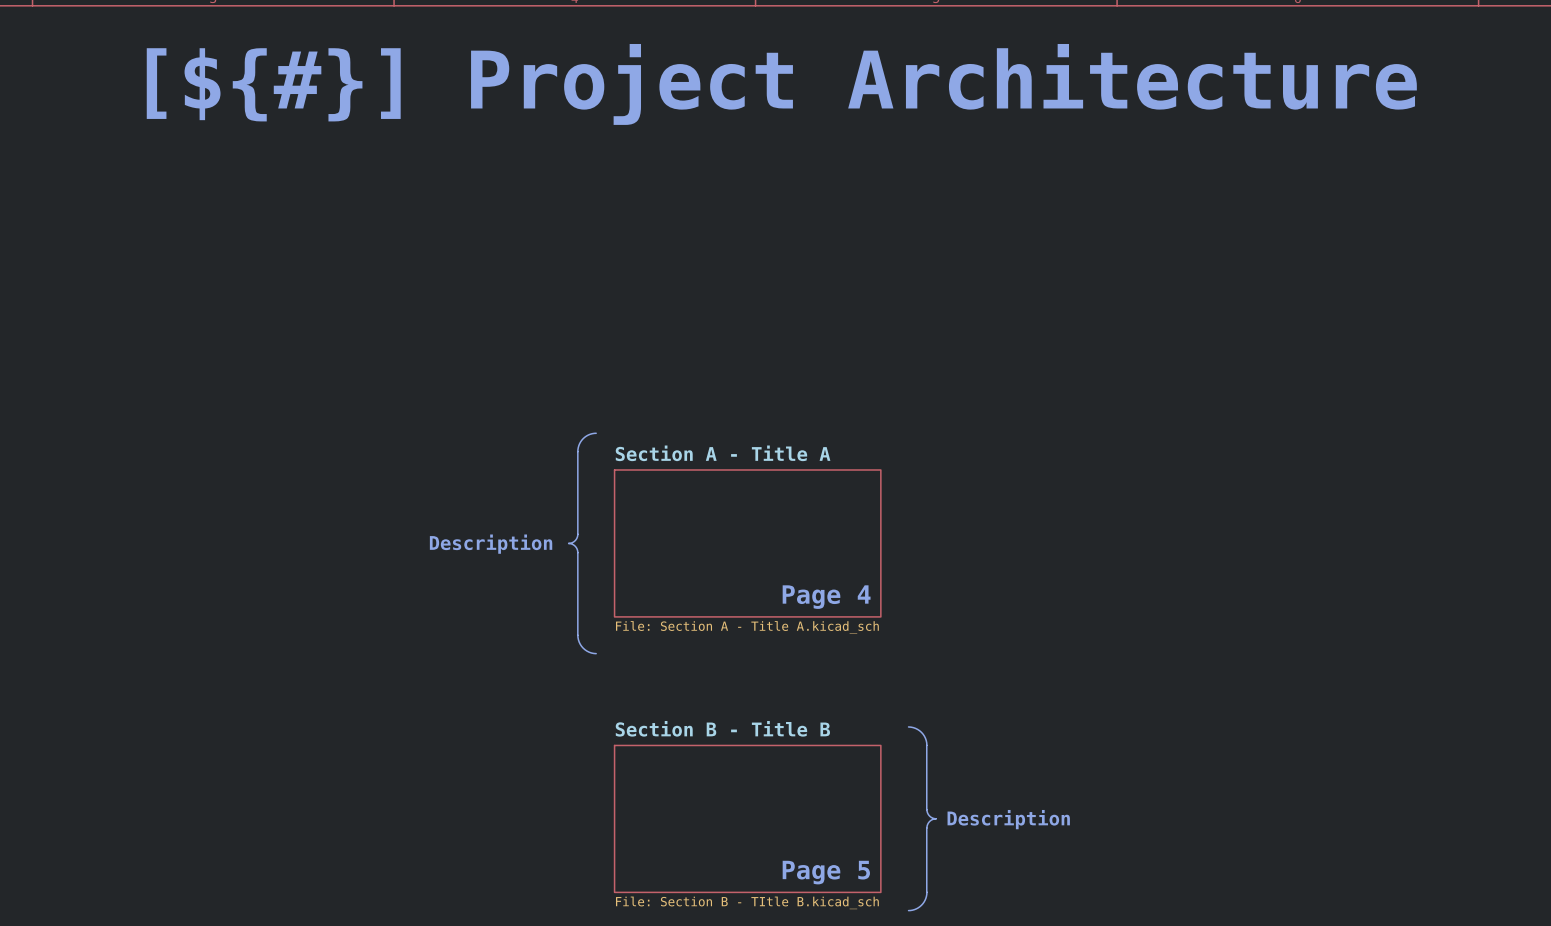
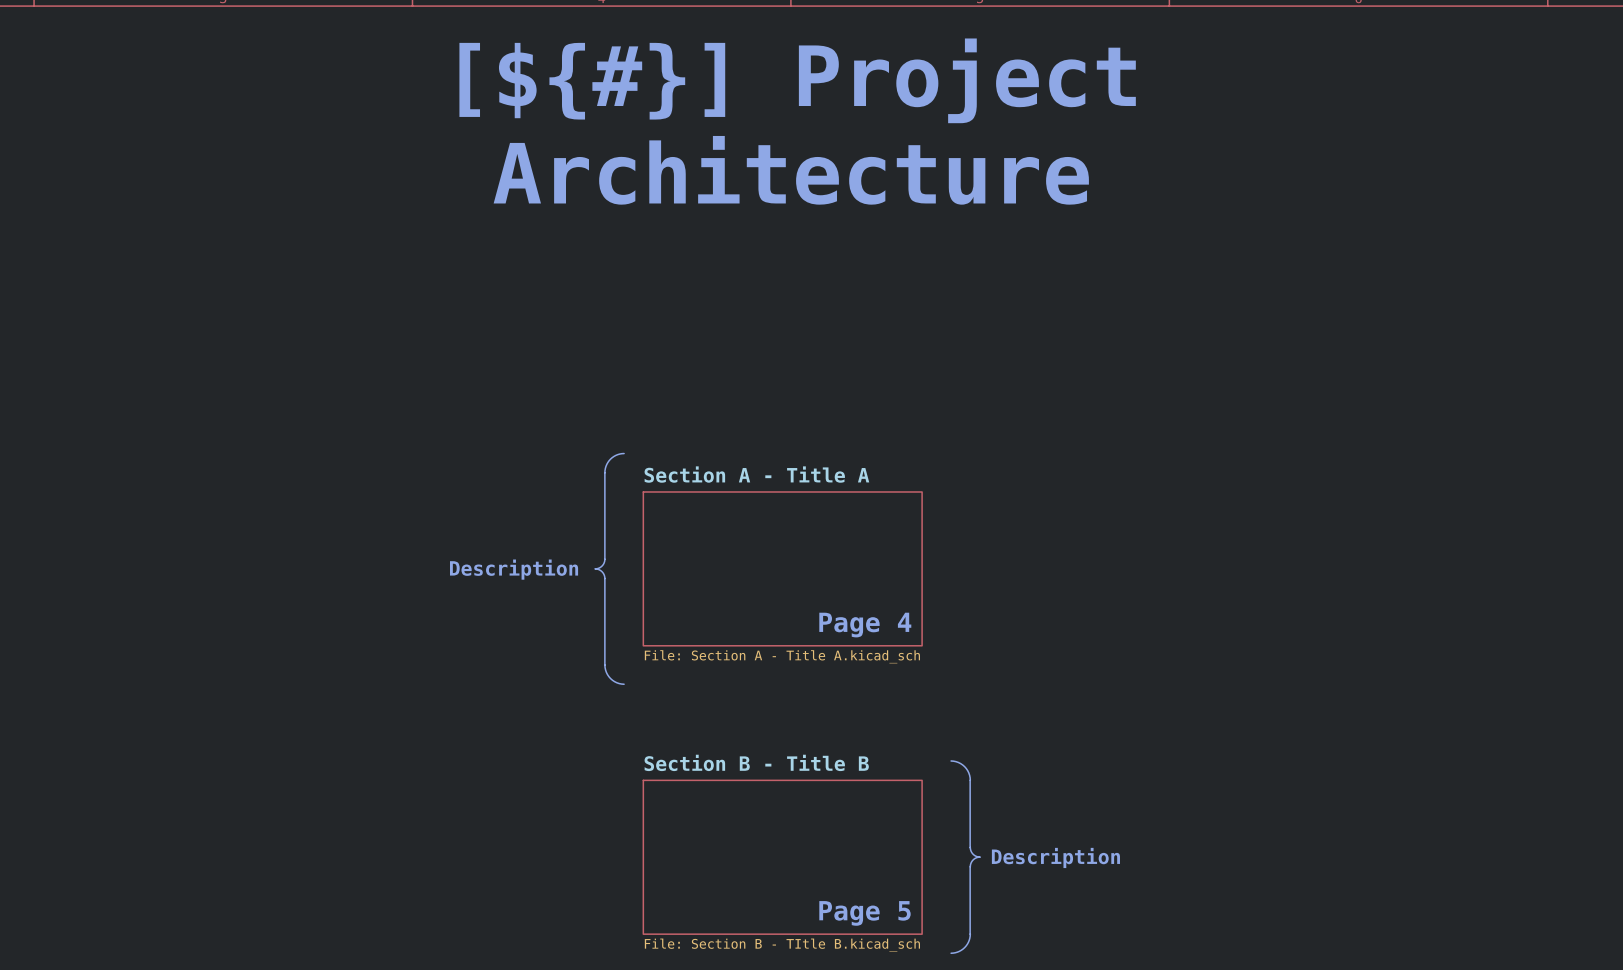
text: [${#}] Project Architecture (781, 84) -> [${#}] Project (797, 80)
text: none -> Architecture (791, 170)

